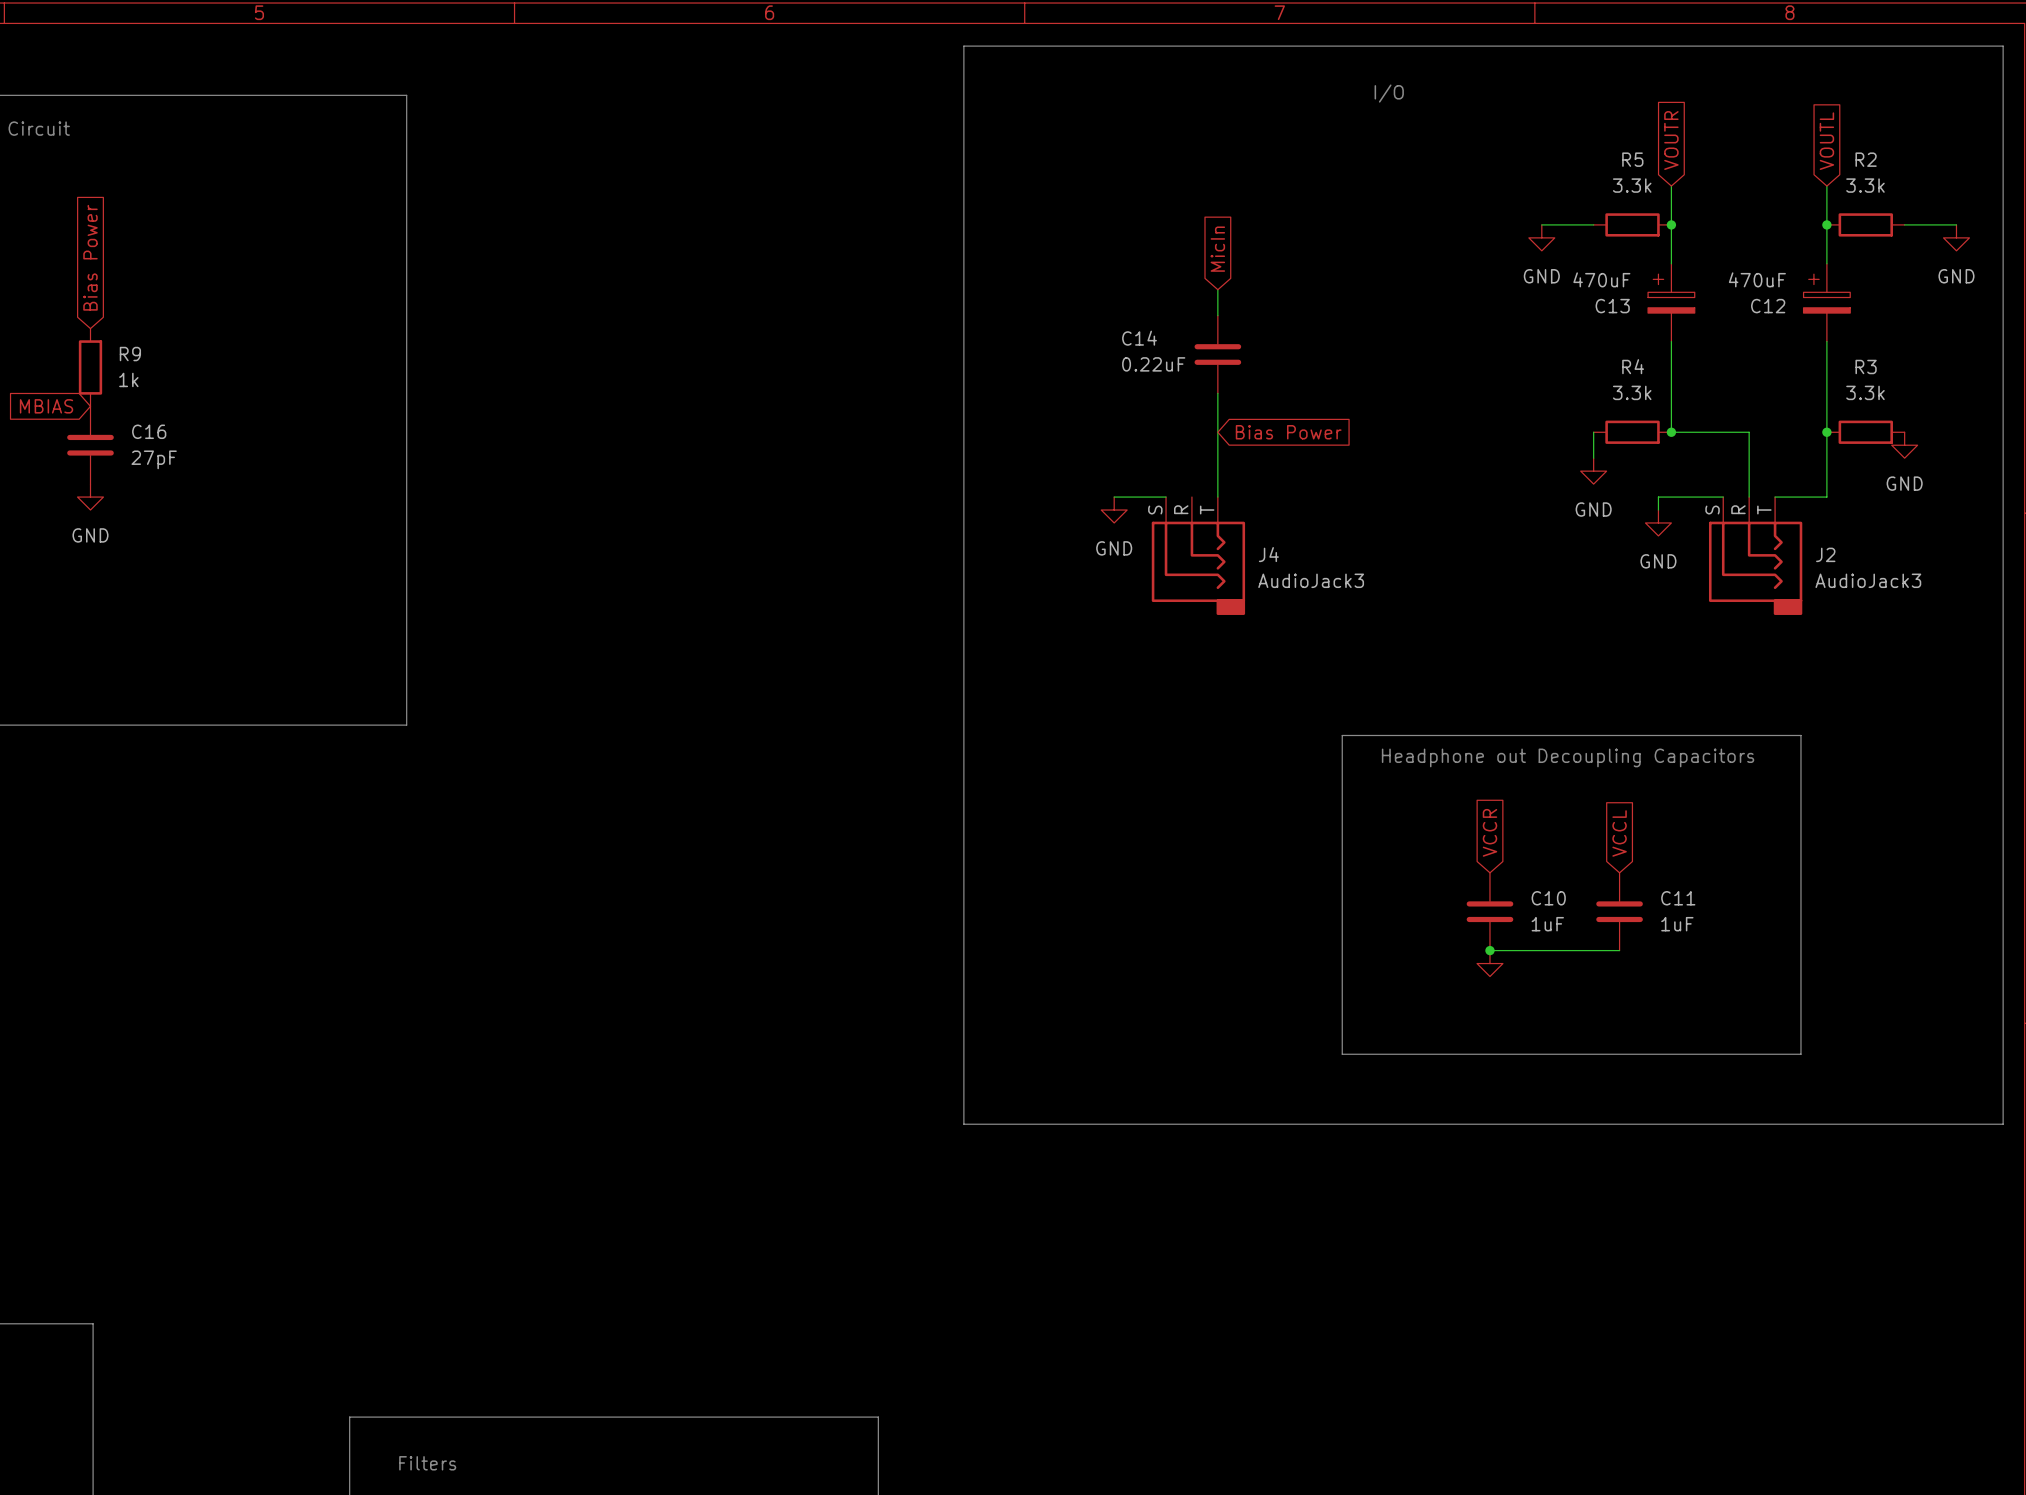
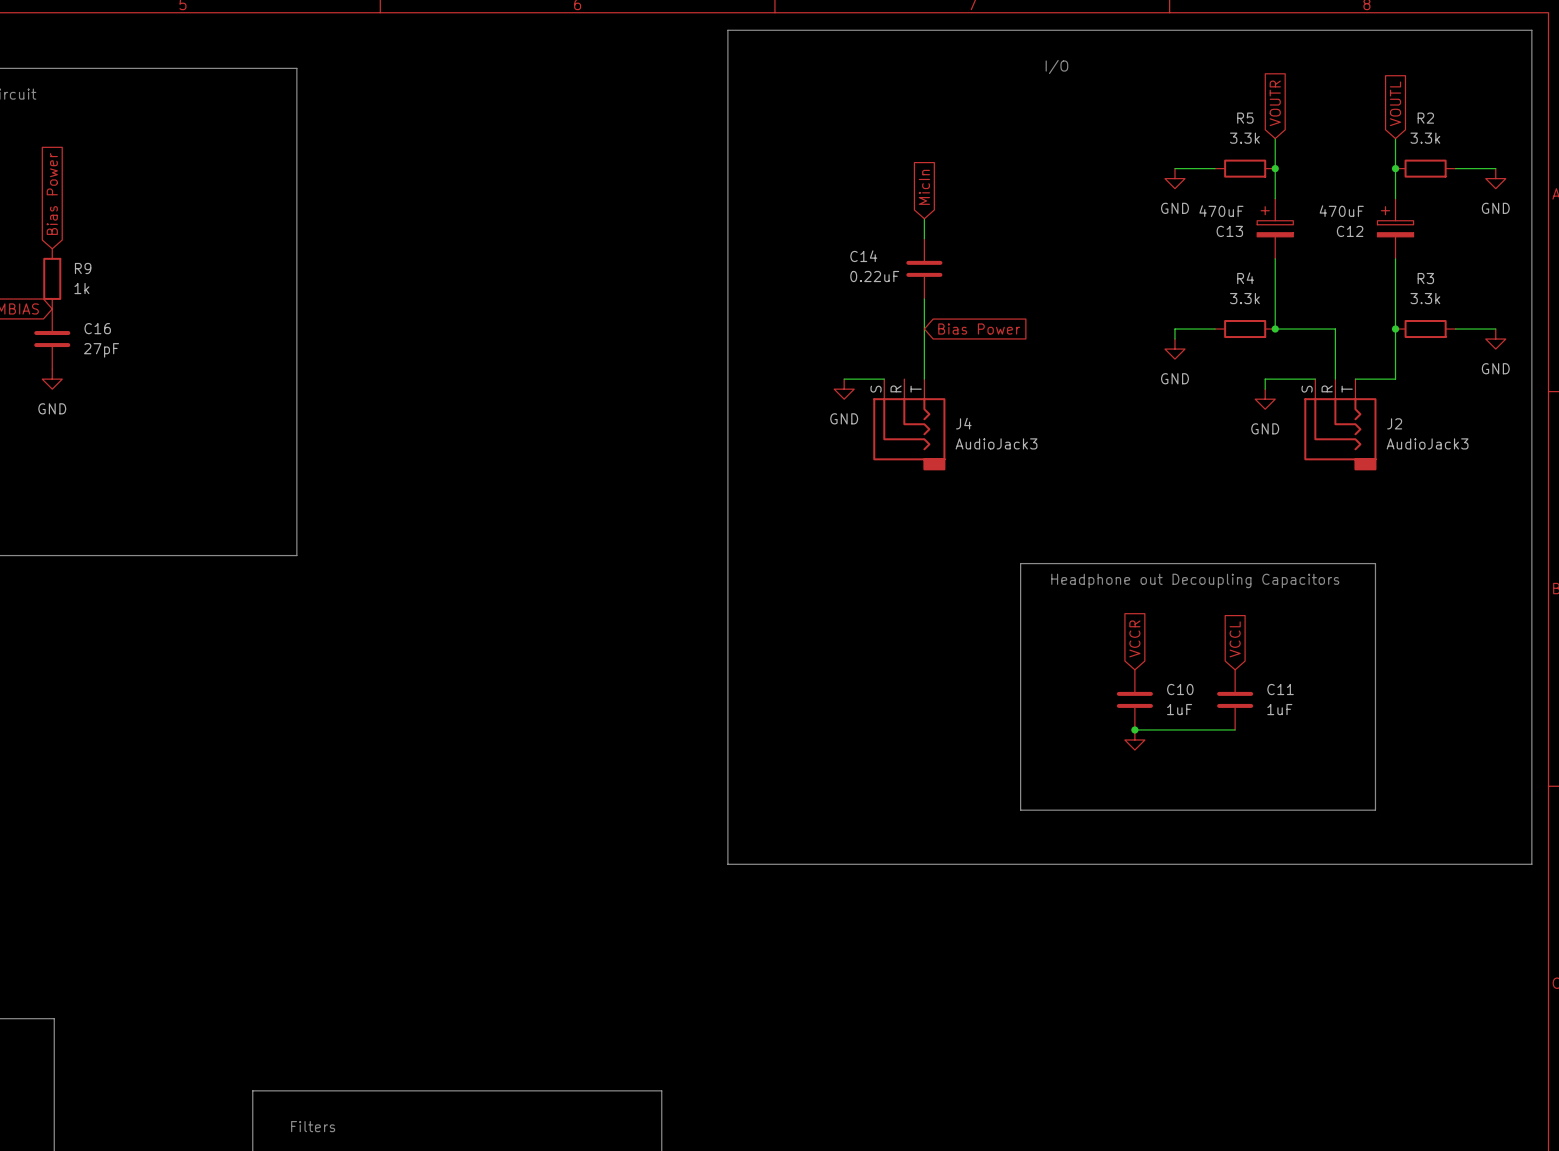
wire: (1593, 432) (1593, 458) -> (1215, 329) (1174, 329) (1174, 339)
wire: none -> (1455, 329) (1495, 329)
power symbol position: GND (1904, 445) -> GND (1495, 339)
power symbol position: GND (1593, 471) -> GND (1174, 349)

